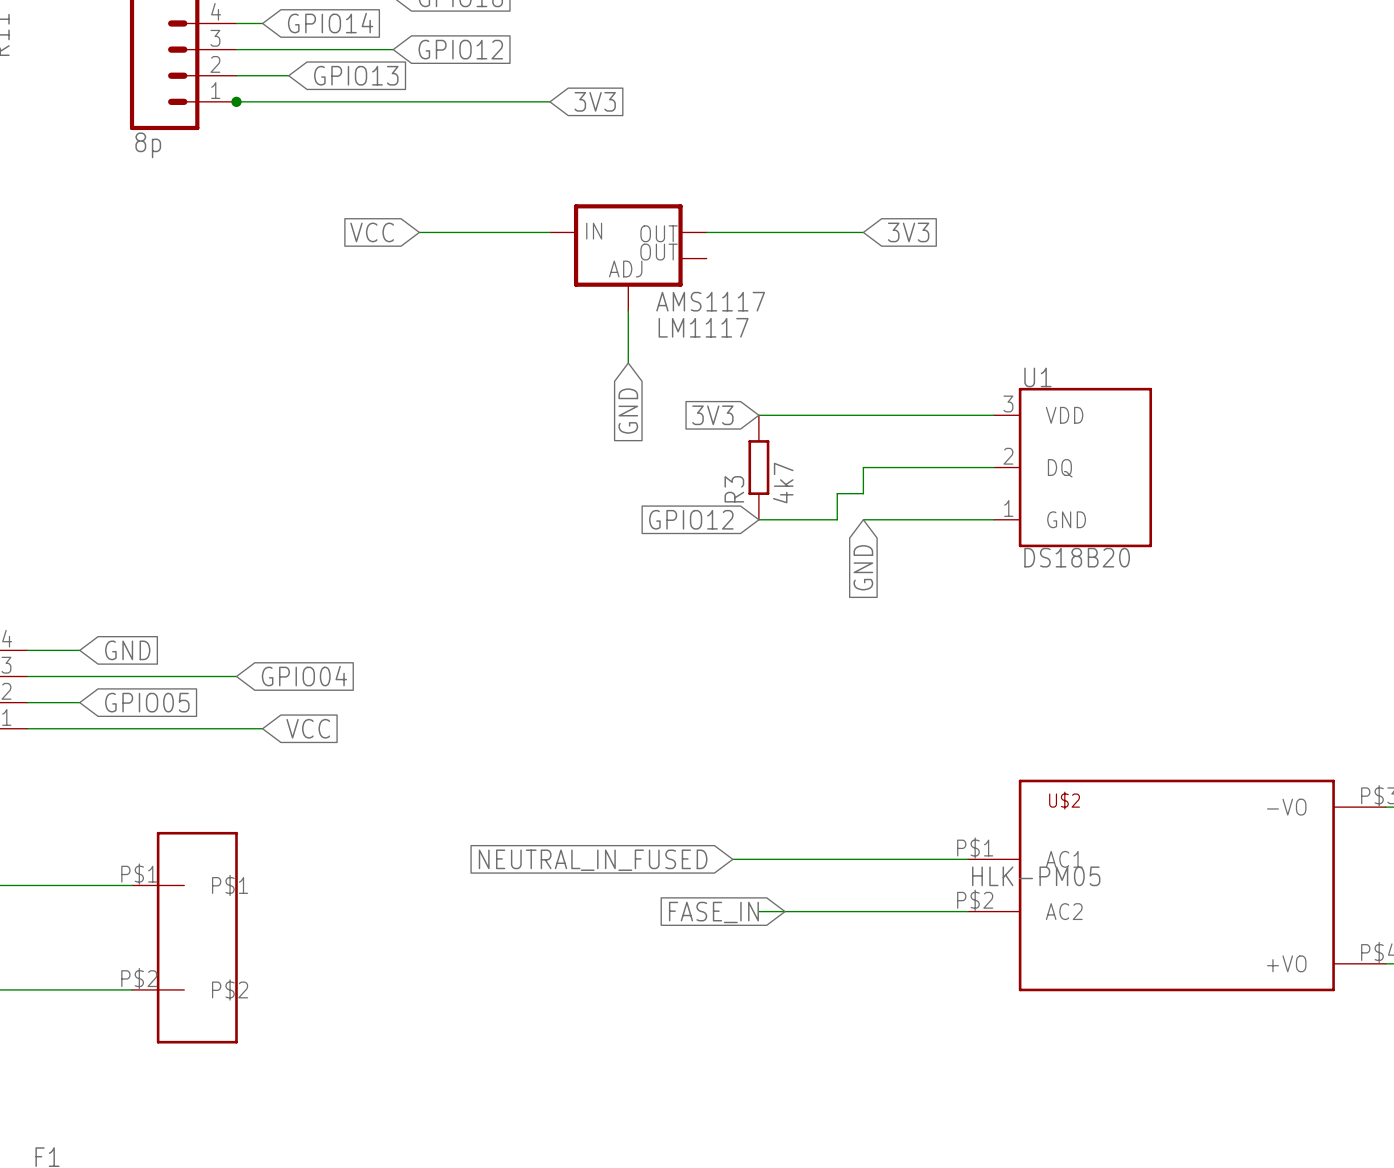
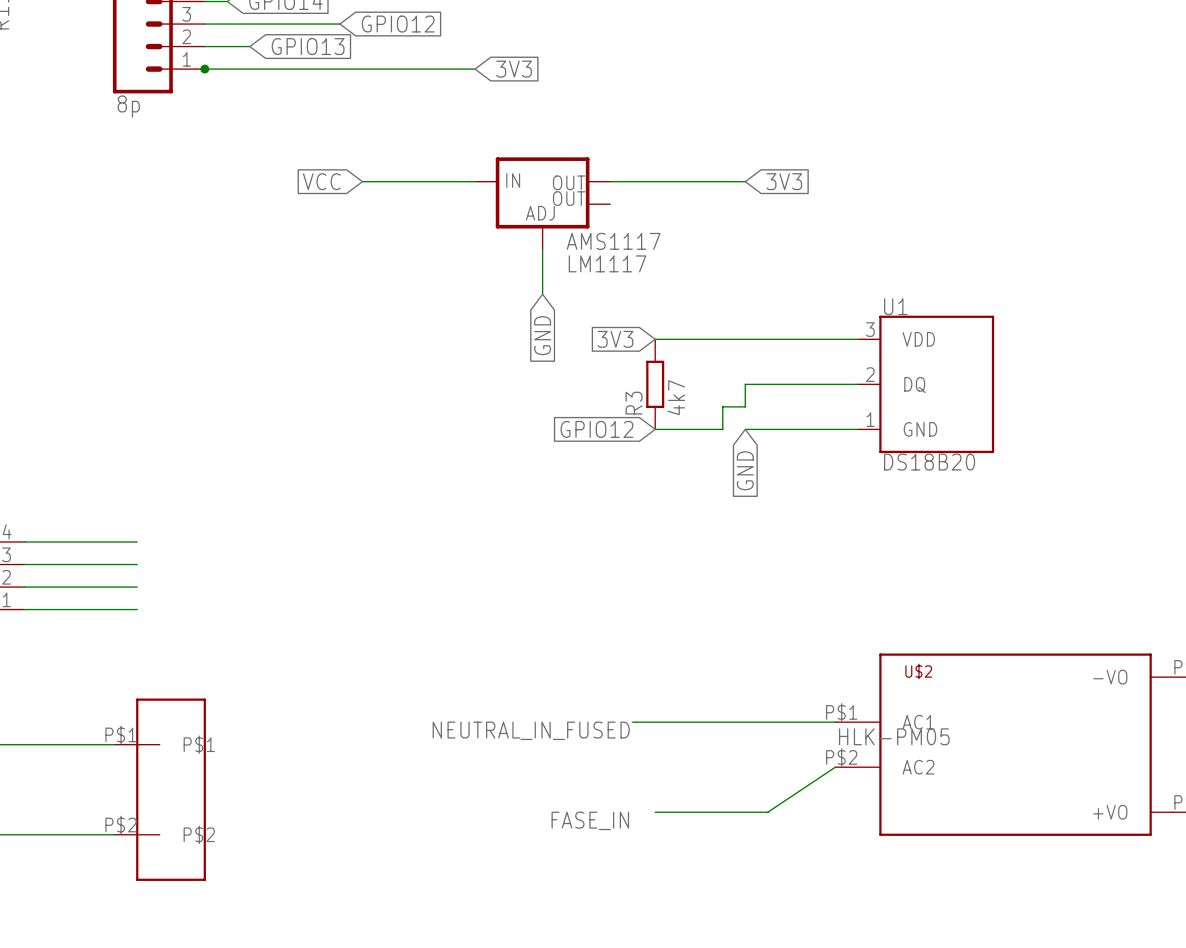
wire: none -> (69, 542) (137, 542)
global label: GND (127, 650) -> none
wire: (158, 676) (236, 676) -> (69, 587) (137, 587)
global label: GPIO04 (304, 676) -> none
global label: GPIO05 (147, 702) -> none
wire: (158, 728) (262, 728) -> none
global label: VCC (308, 728) -> none
global label: NEUTRAL_IN_FUSED (593, 860) -> none
label: none -> NEUTRAL_IN_FUSED (531, 730)
wire: (758, 911) (967, 911) -> (655, 812) (767, 812) (835, 767)
global label: FASE_IN (713, 912) -> none
label: none -> FASE_IN (590, 820)

